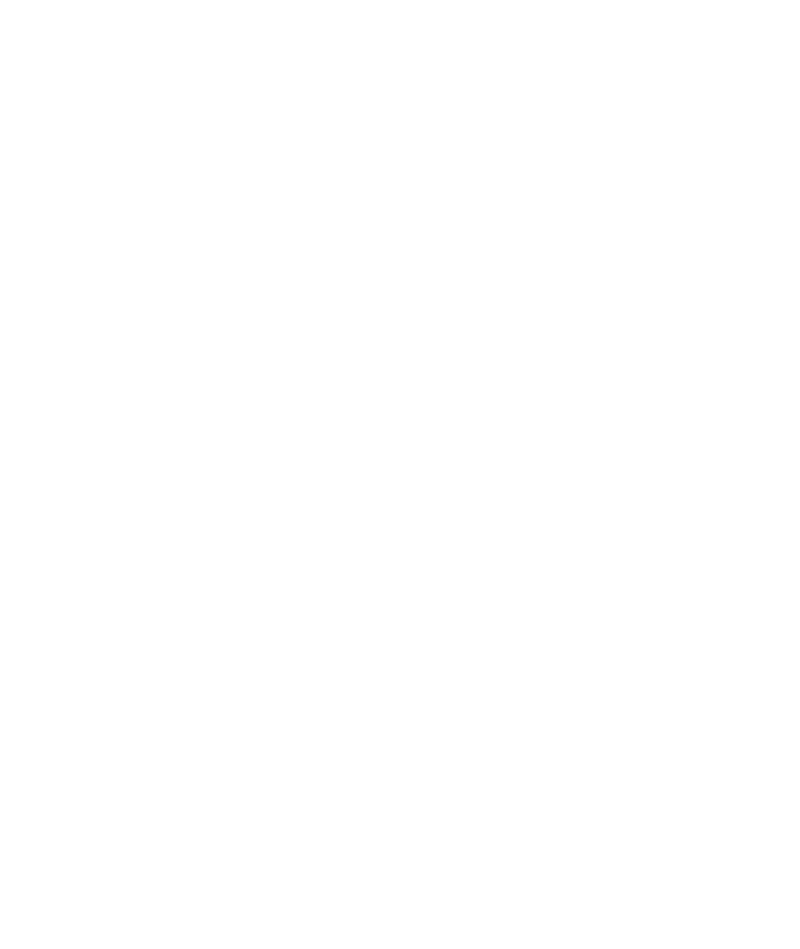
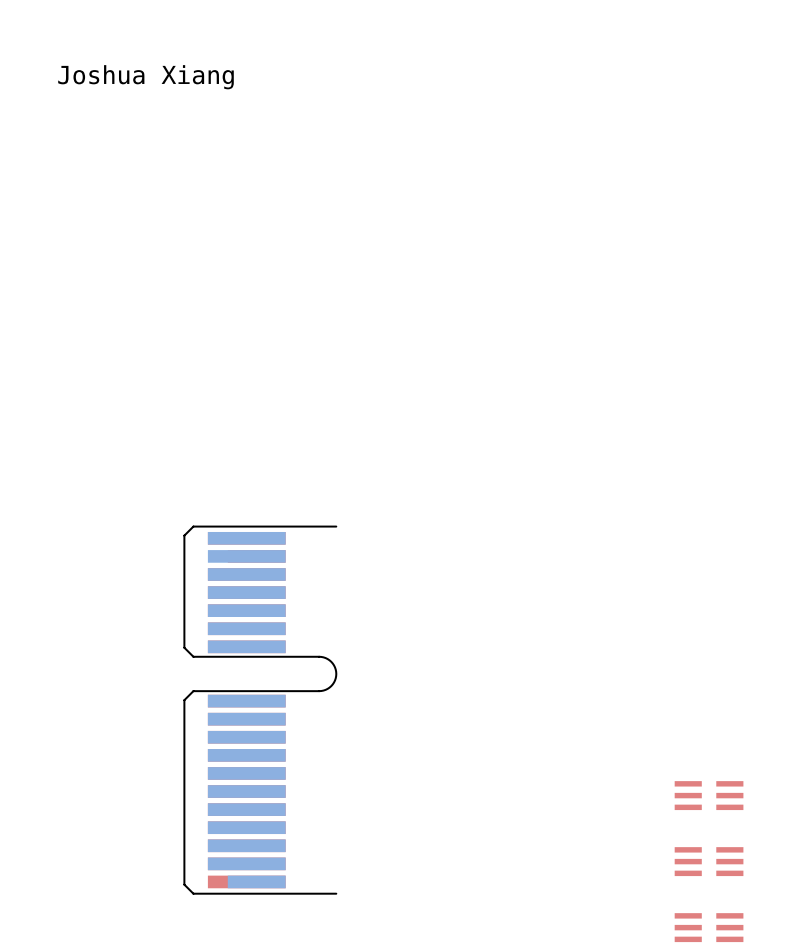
text: none -> Joshua Xiang (146, 77)
part: none -> (260, 710)
part: none -> (709, 795)
part: none -> (709, 861)
part: none -> (709, 927)

